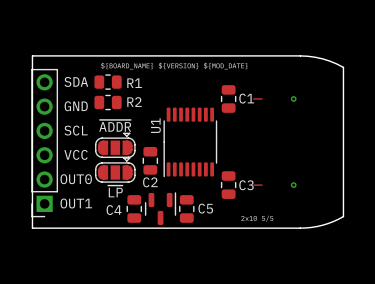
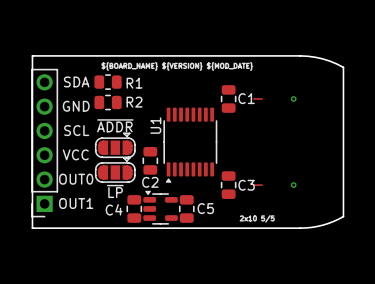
U1 footprint: [163, 107, 218, 178] -> [163, 107, 218, 183]
part footprint: [145, 192, 177, 225] -> [143, 190, 178, 225]

